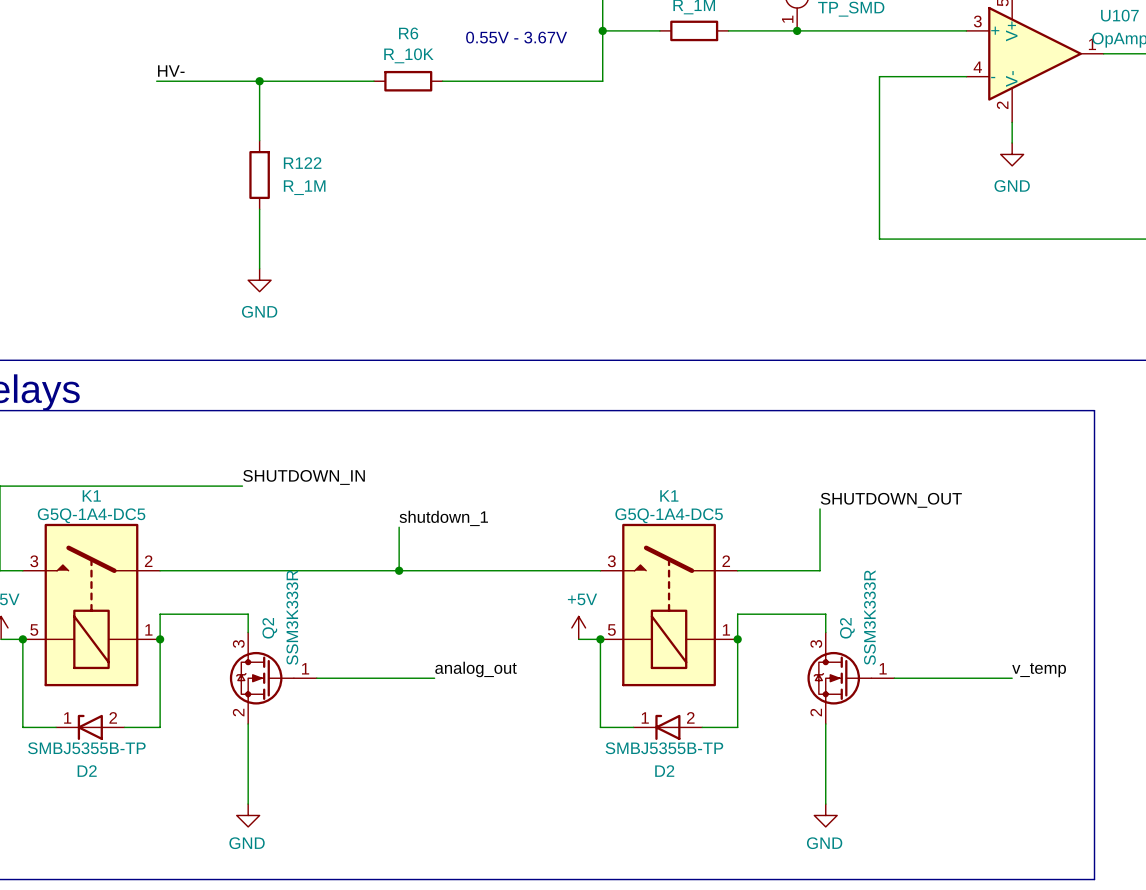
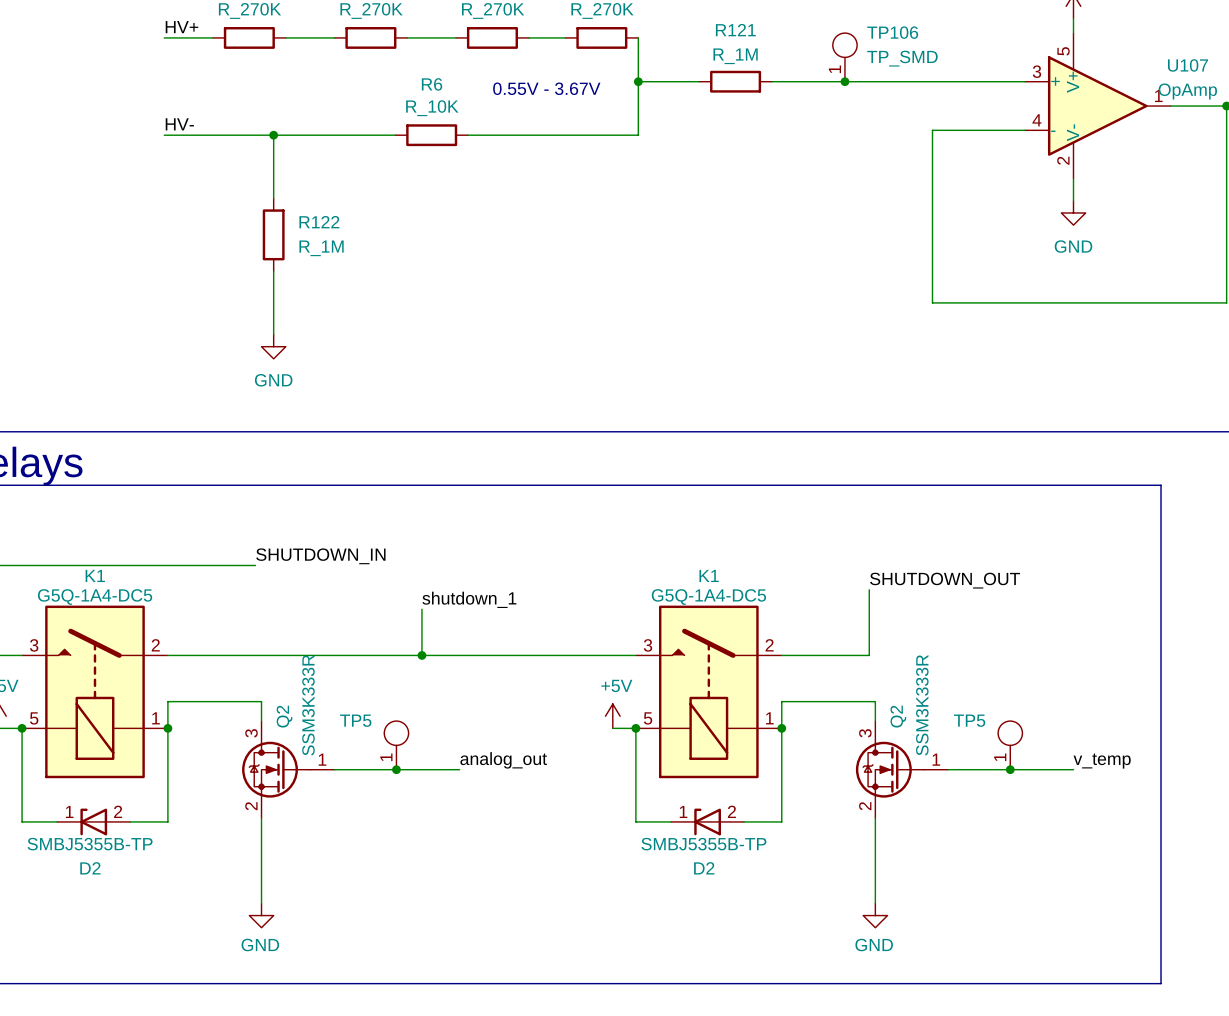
TP5: none -> (396, 745)
TP5: none -> (1010, 745)
junction: none -> (396, 769)
junction: none -> (1010, 769)

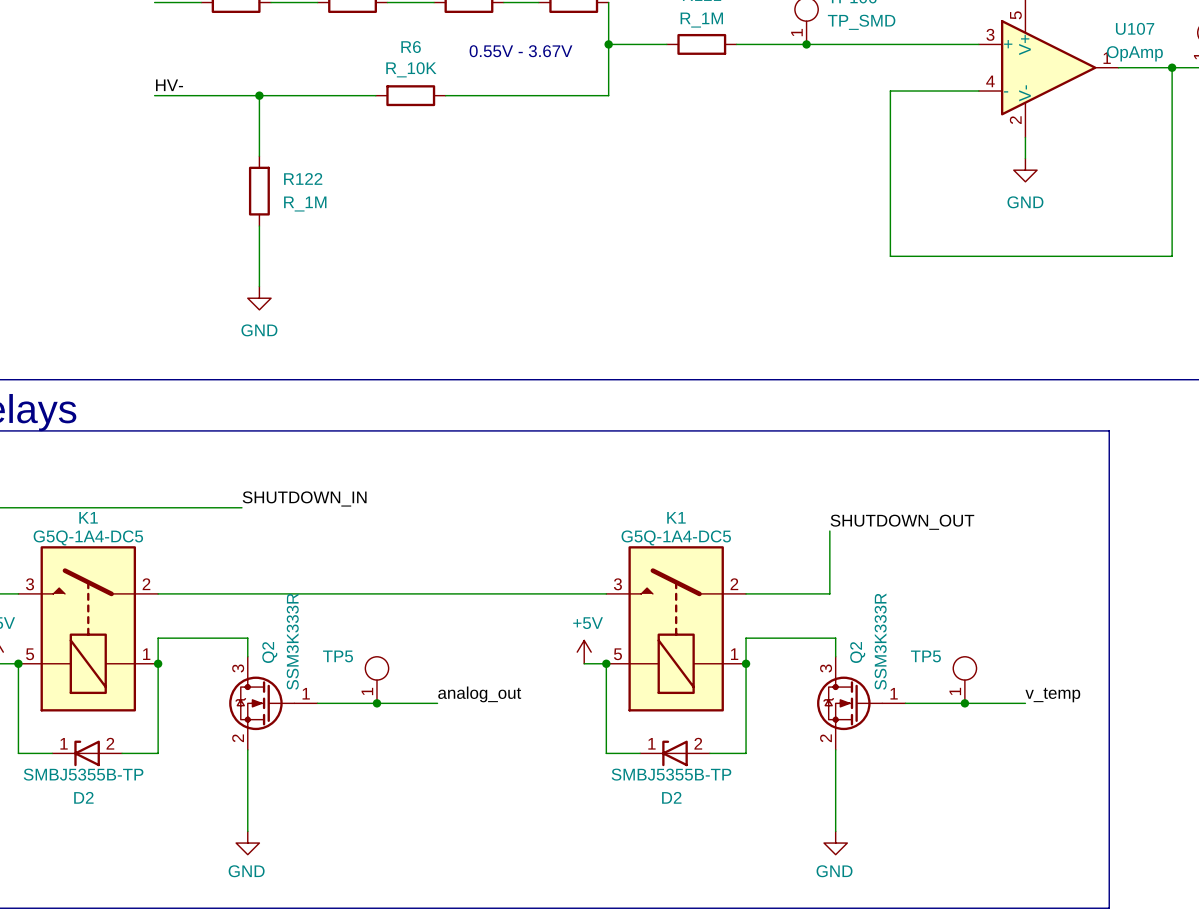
label: shutdown_1 (469, 599) -> none
wire: (421, 609) (421, 655) -> none
junction: (421, 655) -> none

